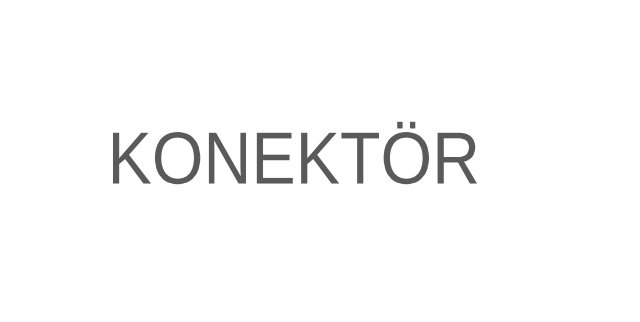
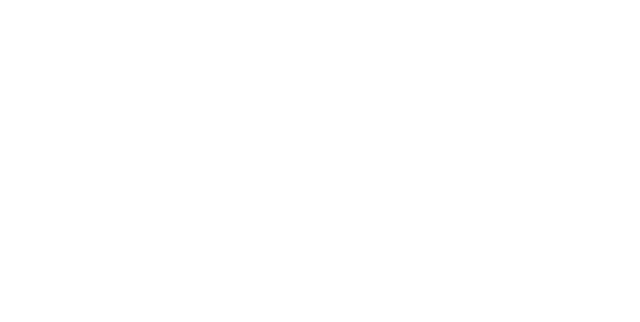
text: KONEKTÖR (294, 153) -> none

